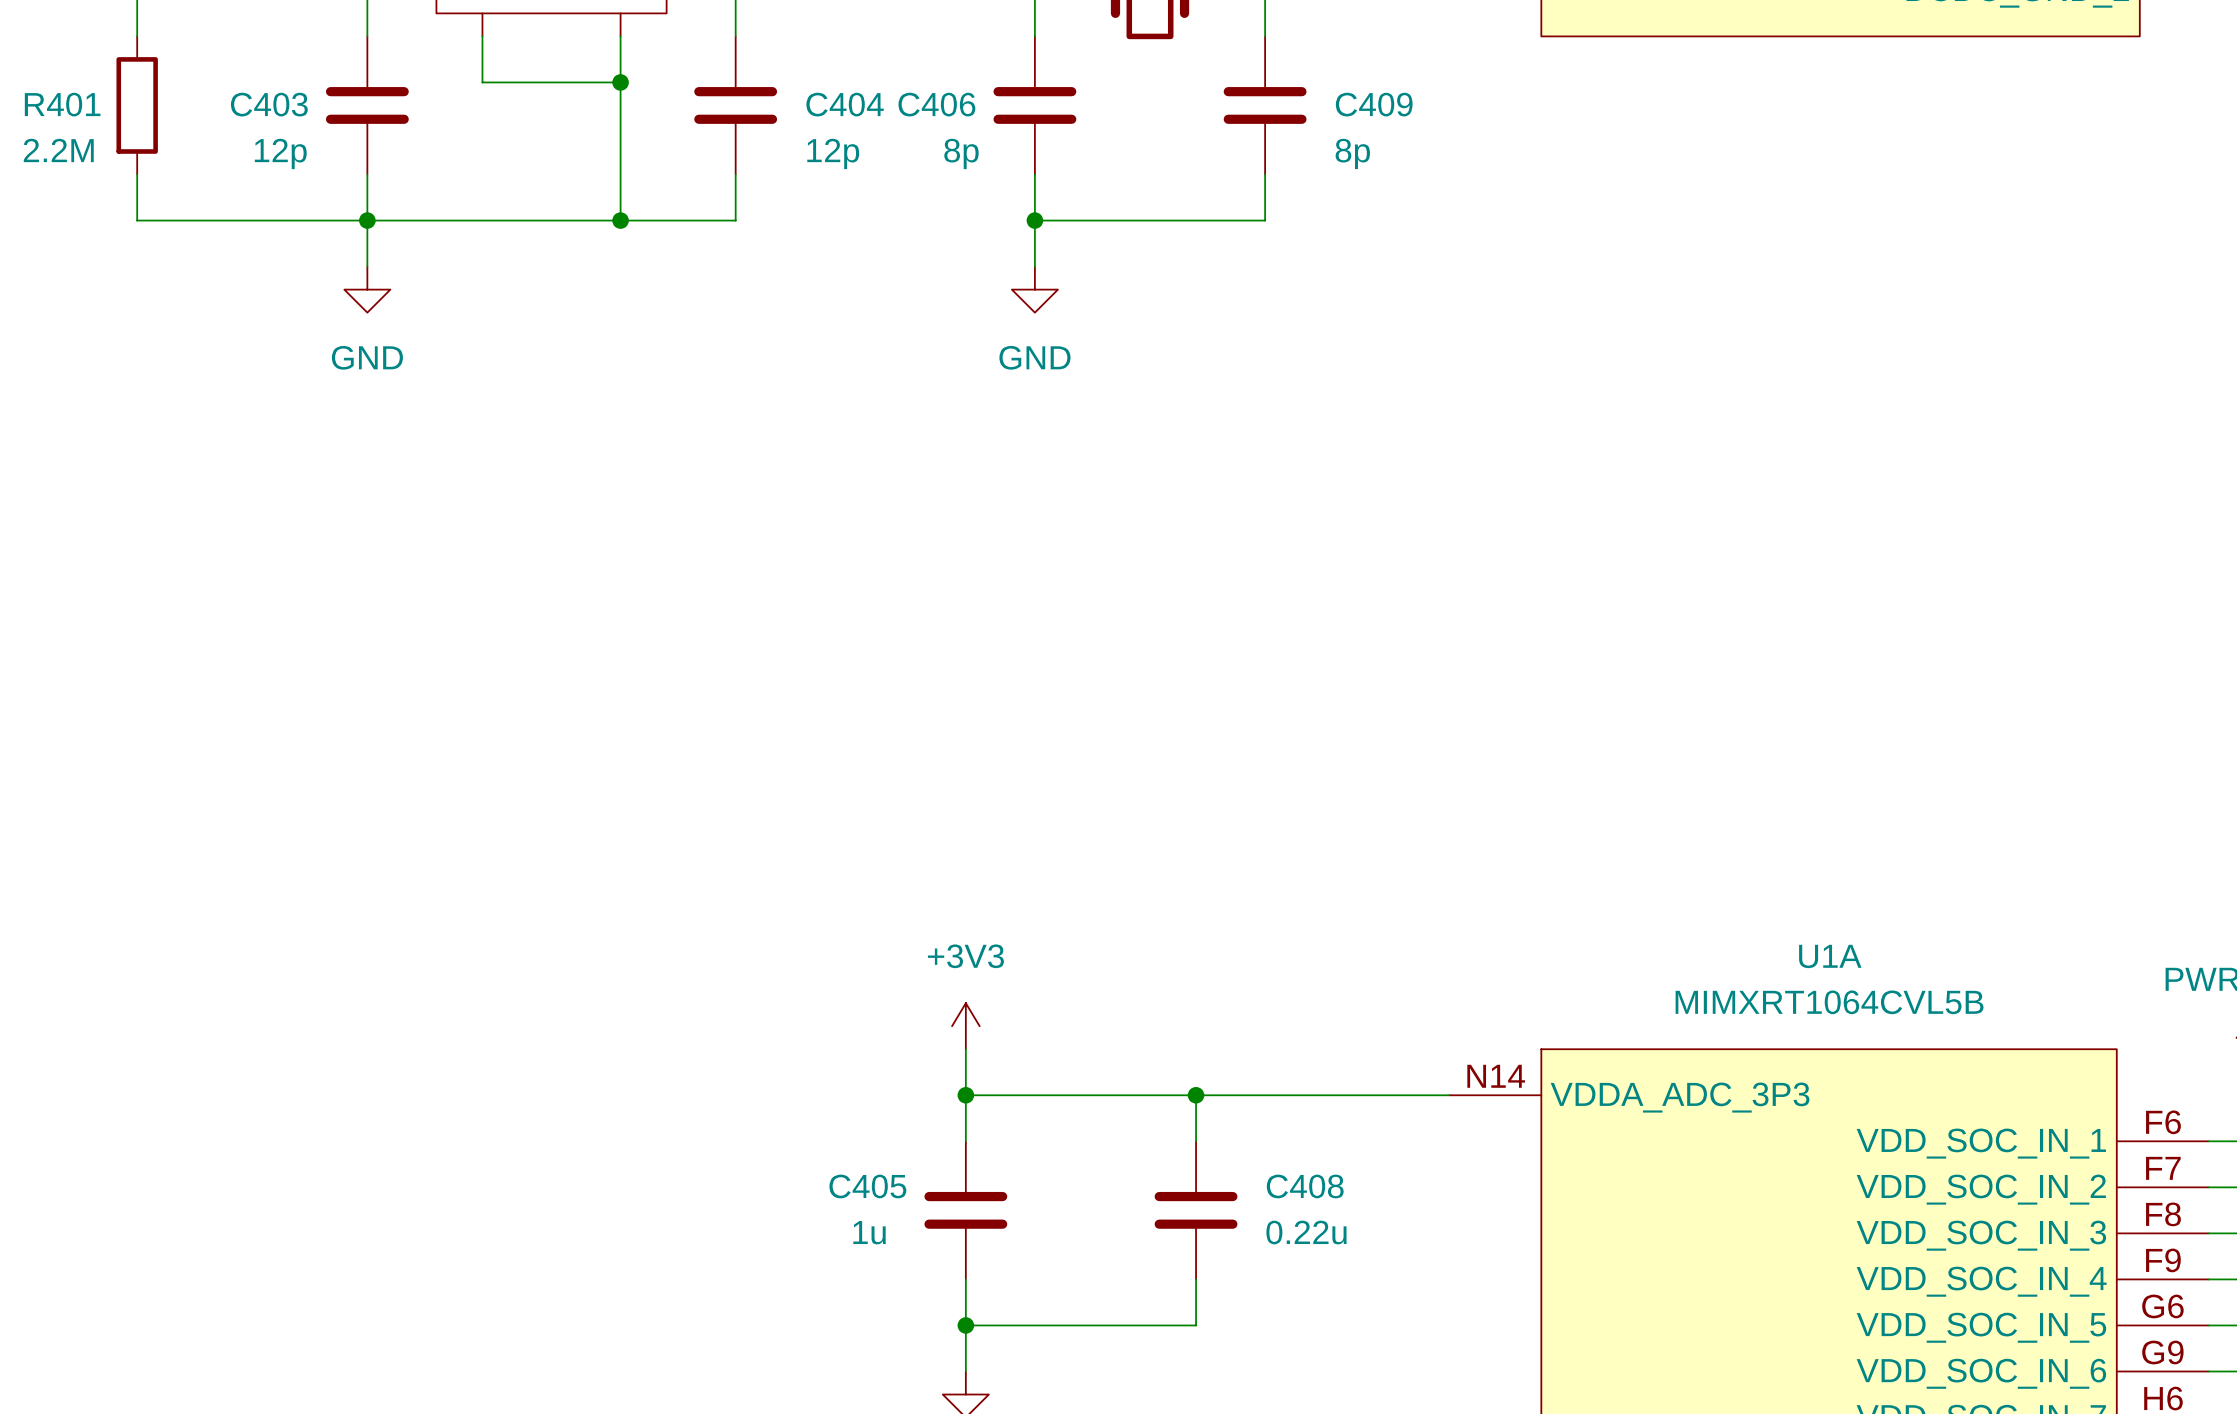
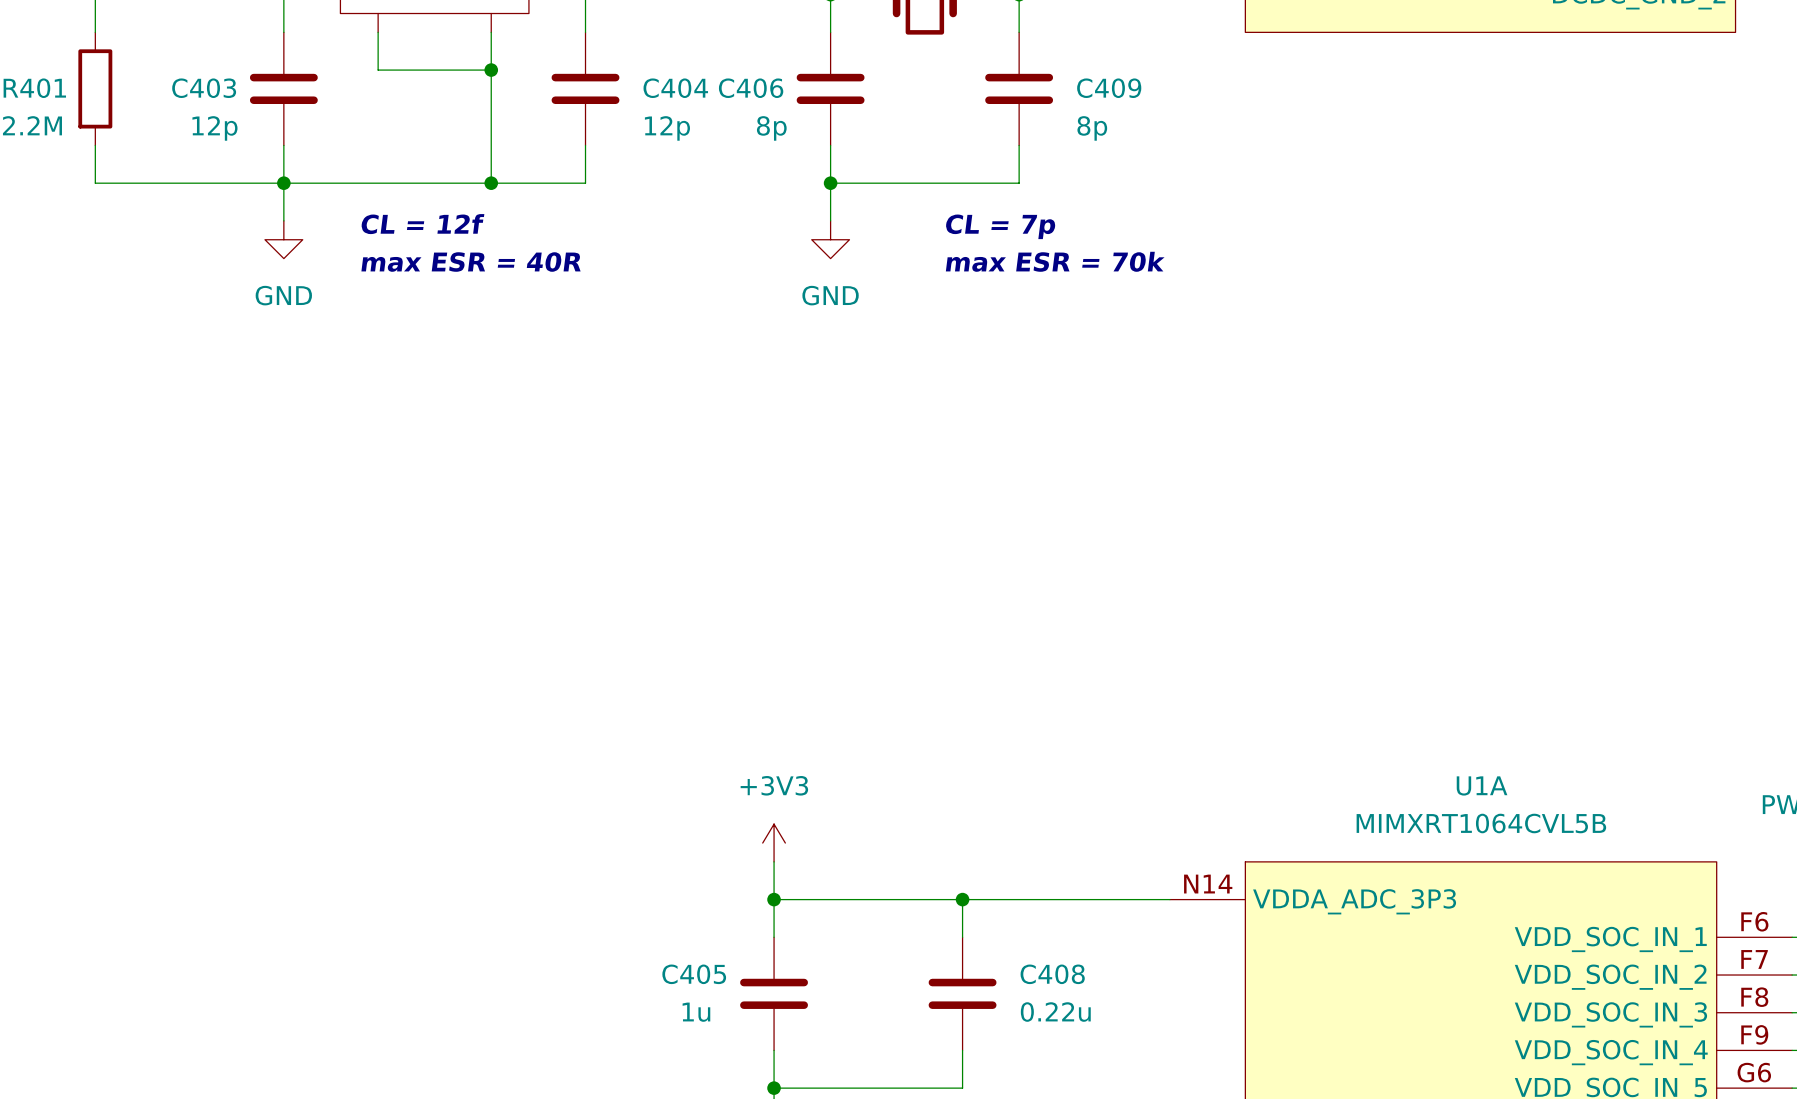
text: none -> CL = 12f (422, 224)
text: none -> CL = 7p (1000, 226)
text: none -> max ESR = 40R (471, 262)
text: none -> max ESR = 70k (1055, 261)

